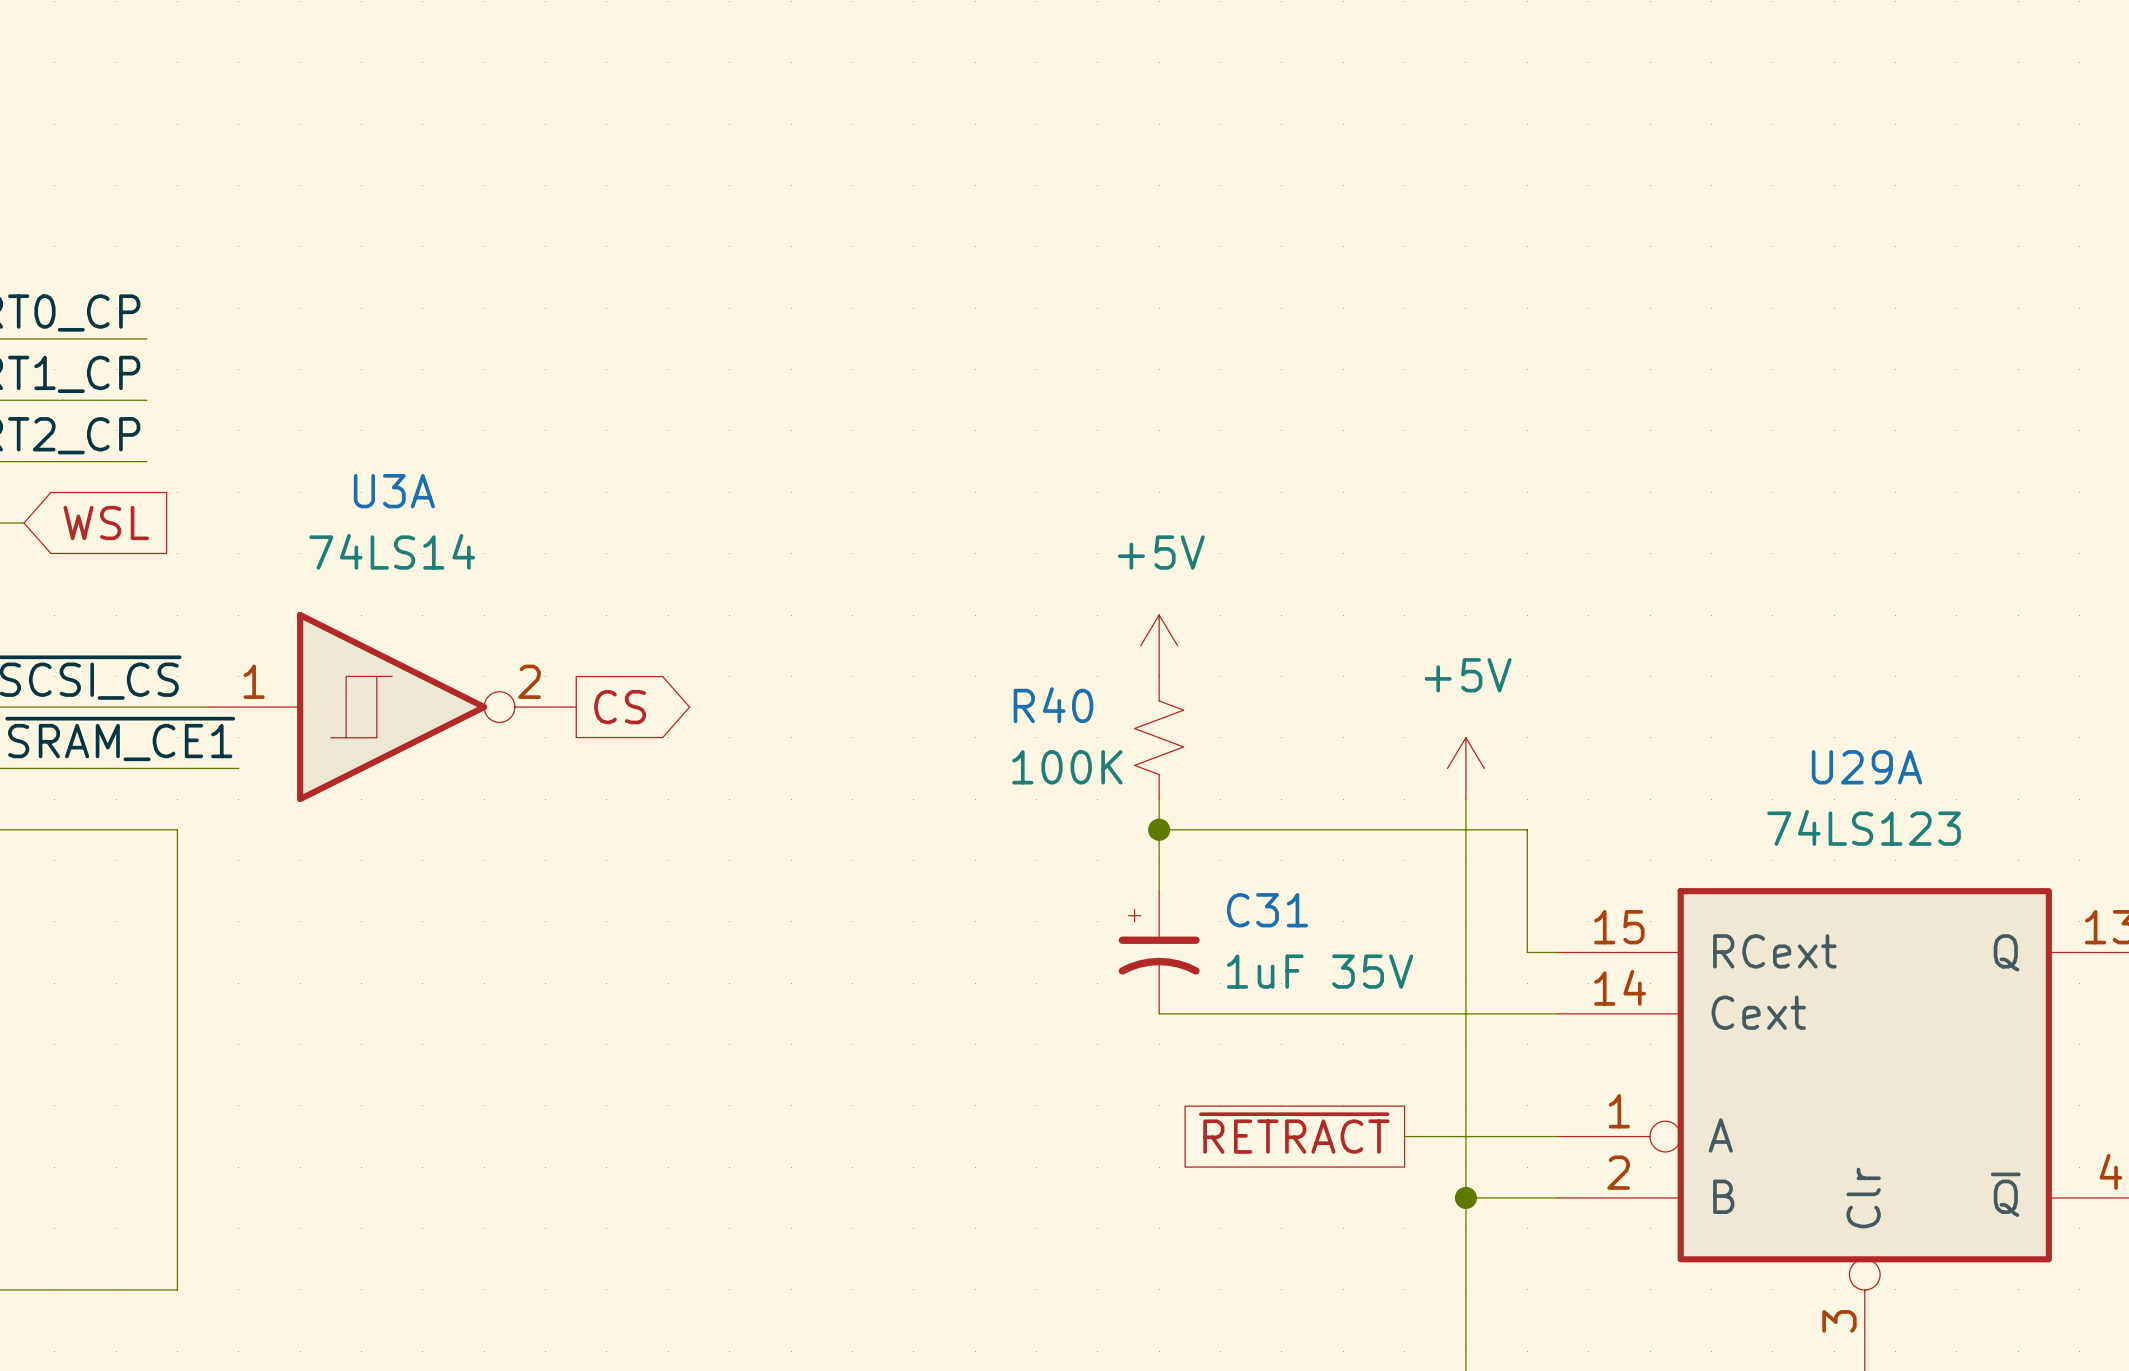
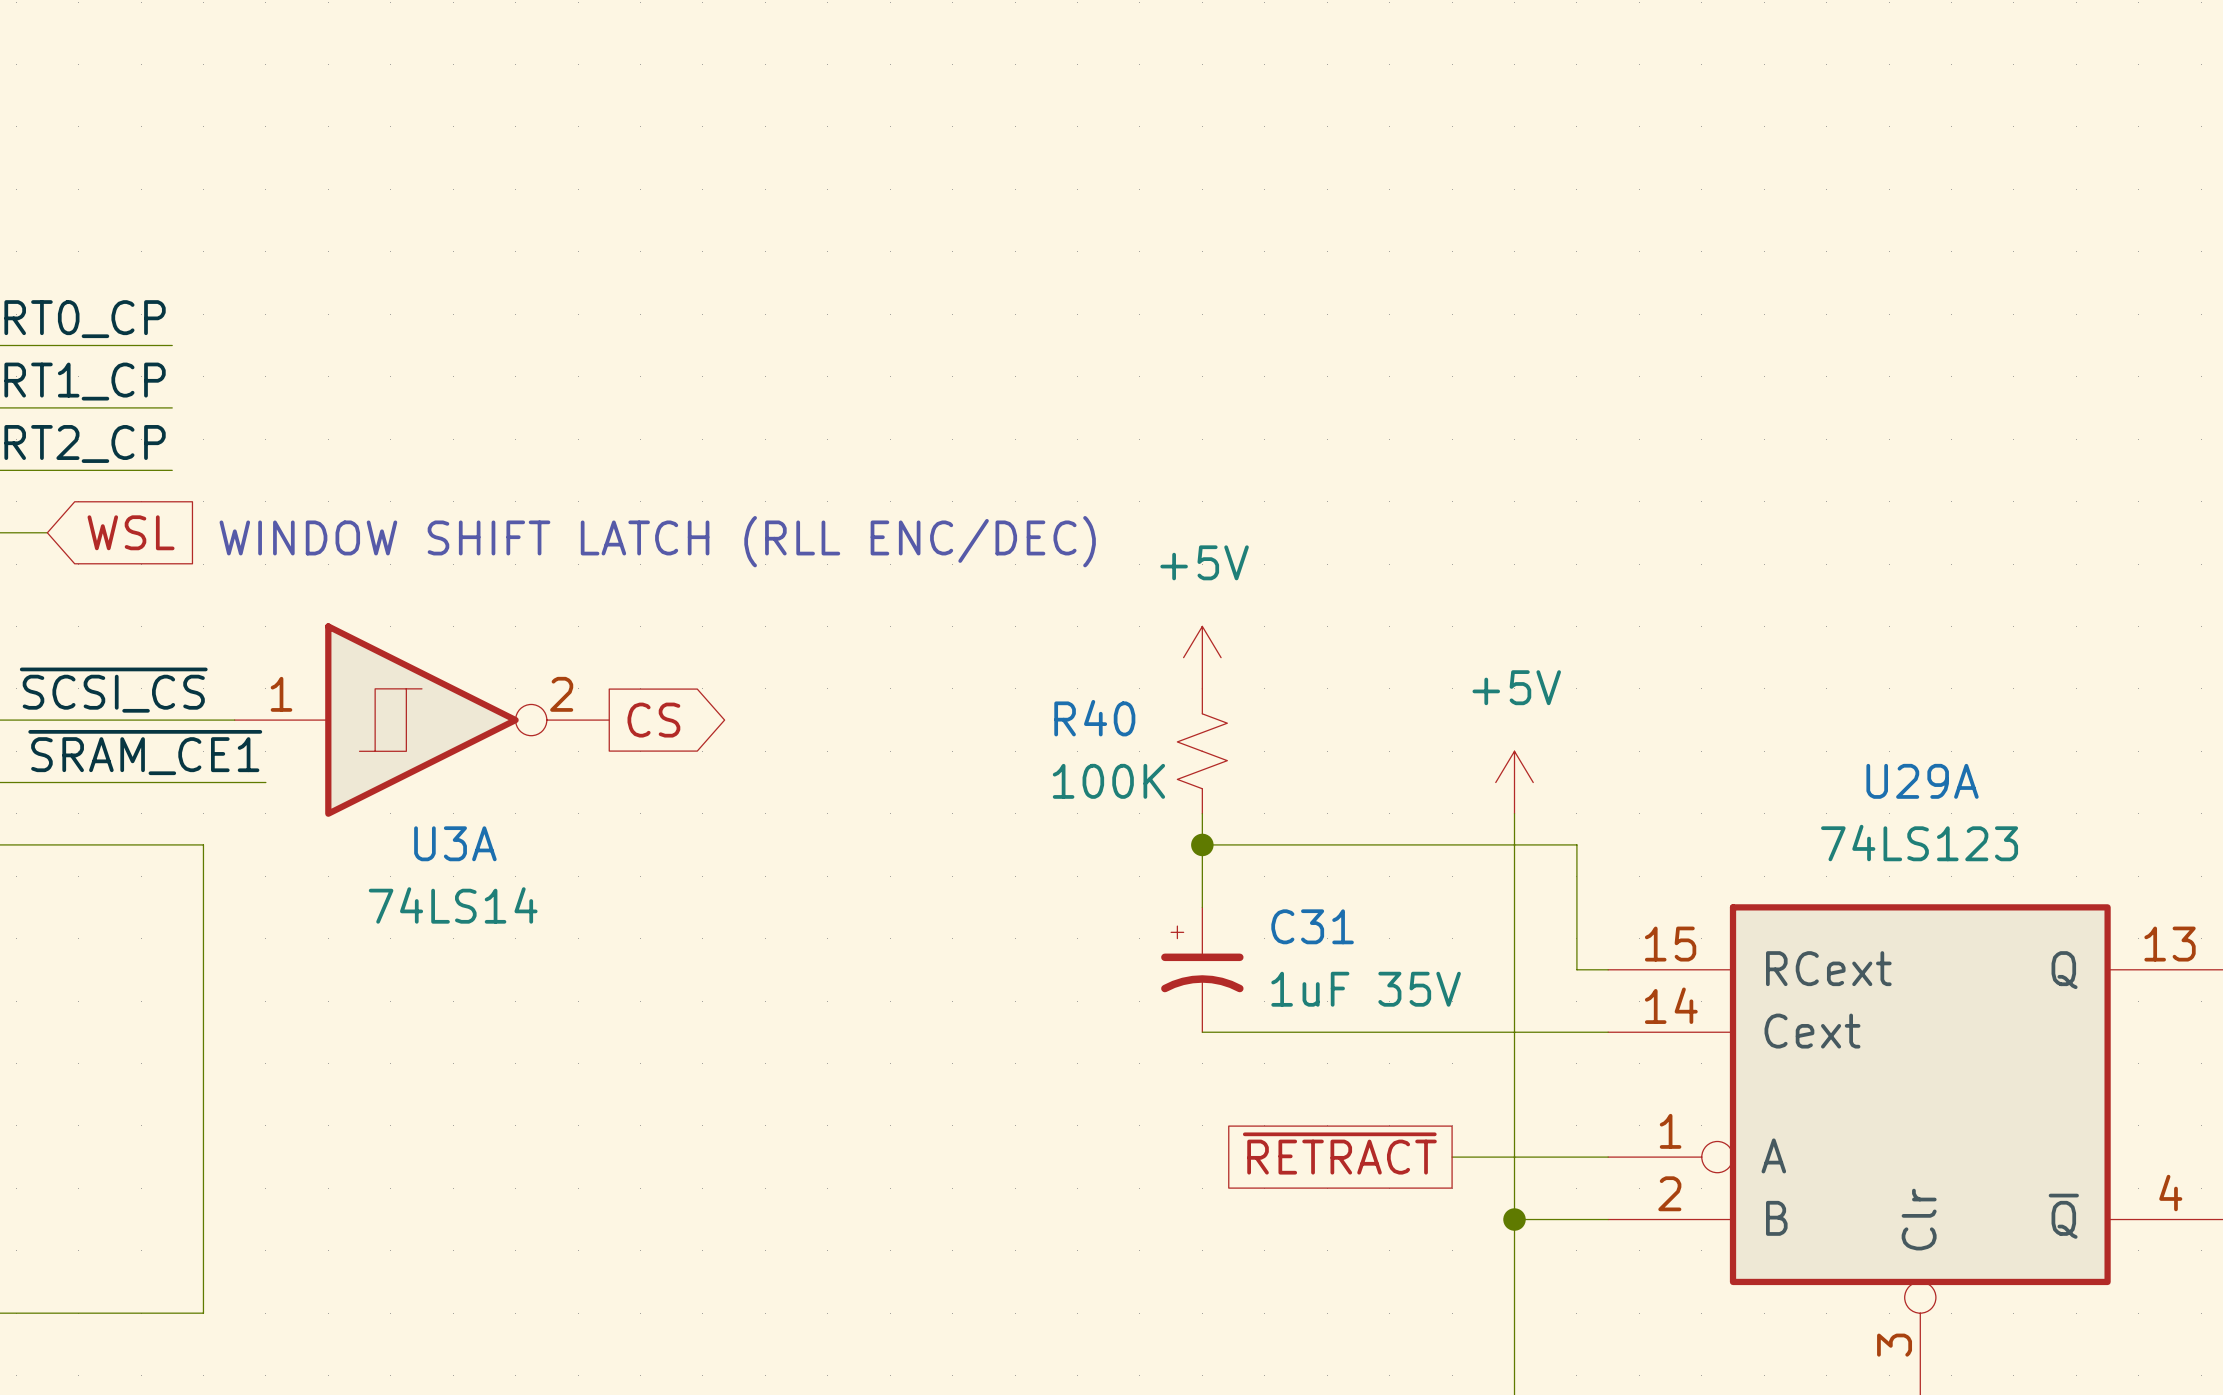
U3A name position: U3A (394, 491) -> U3A (455, 843)
text: none -> WINDOW SHIFT LATCH (RLL ENC/DEC) (657, 541)
U3A value position: 74LS14 (392, 551) -> 74LS14 (453, 905)

